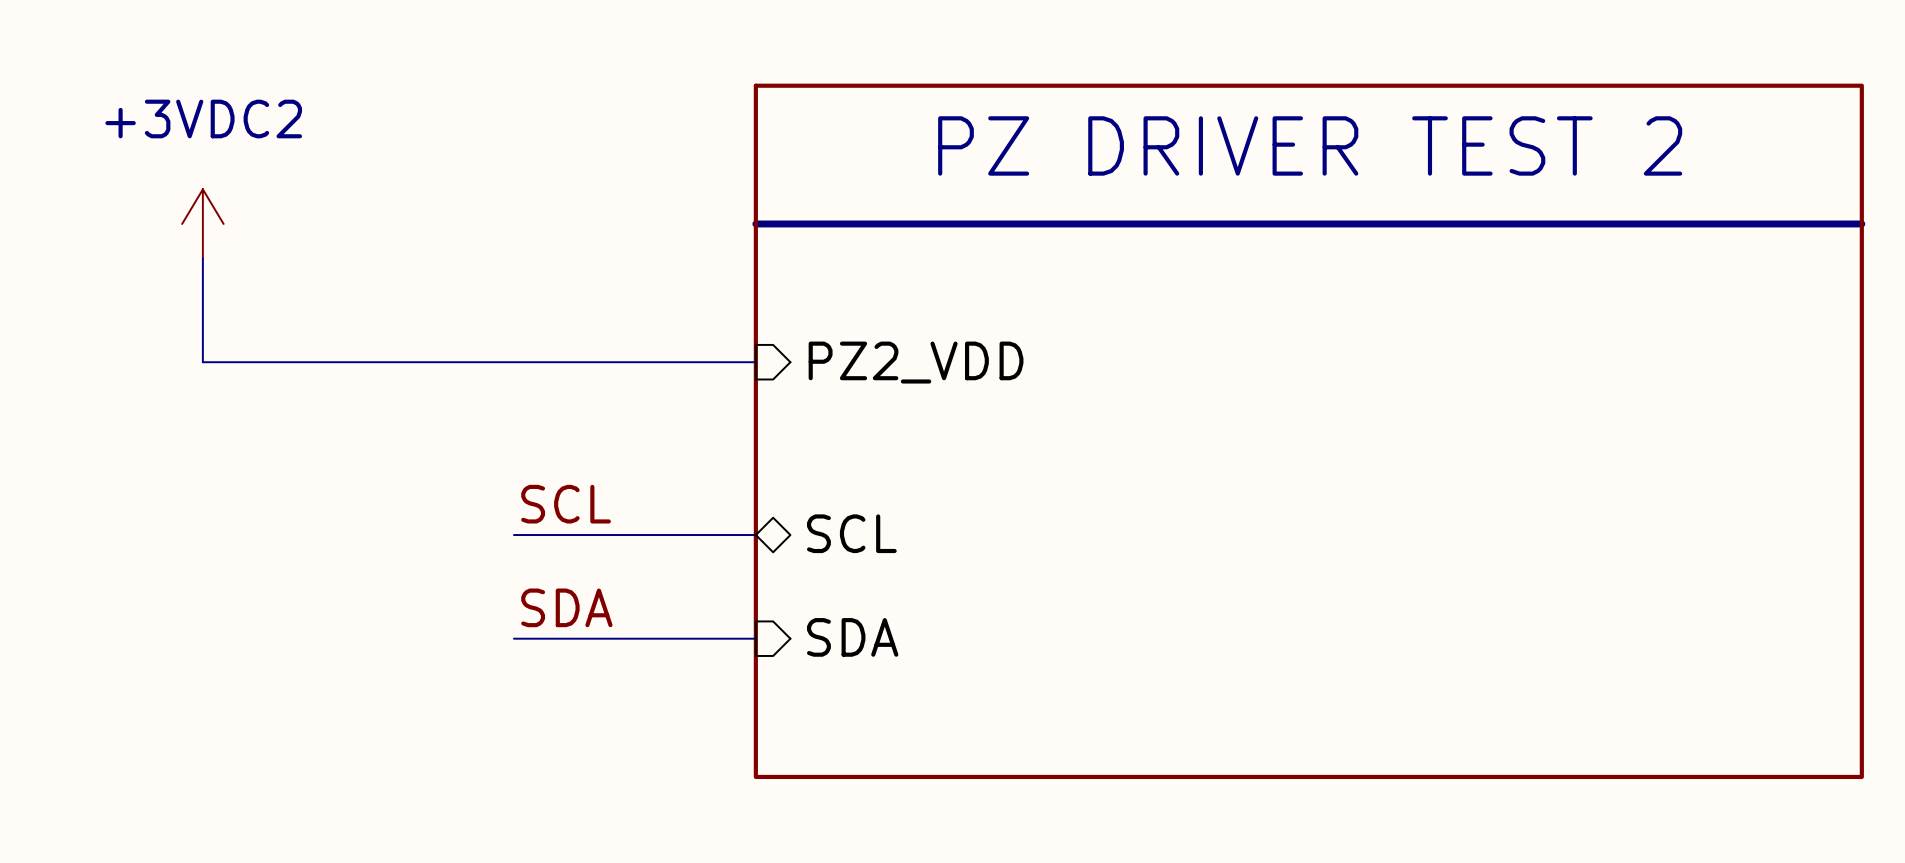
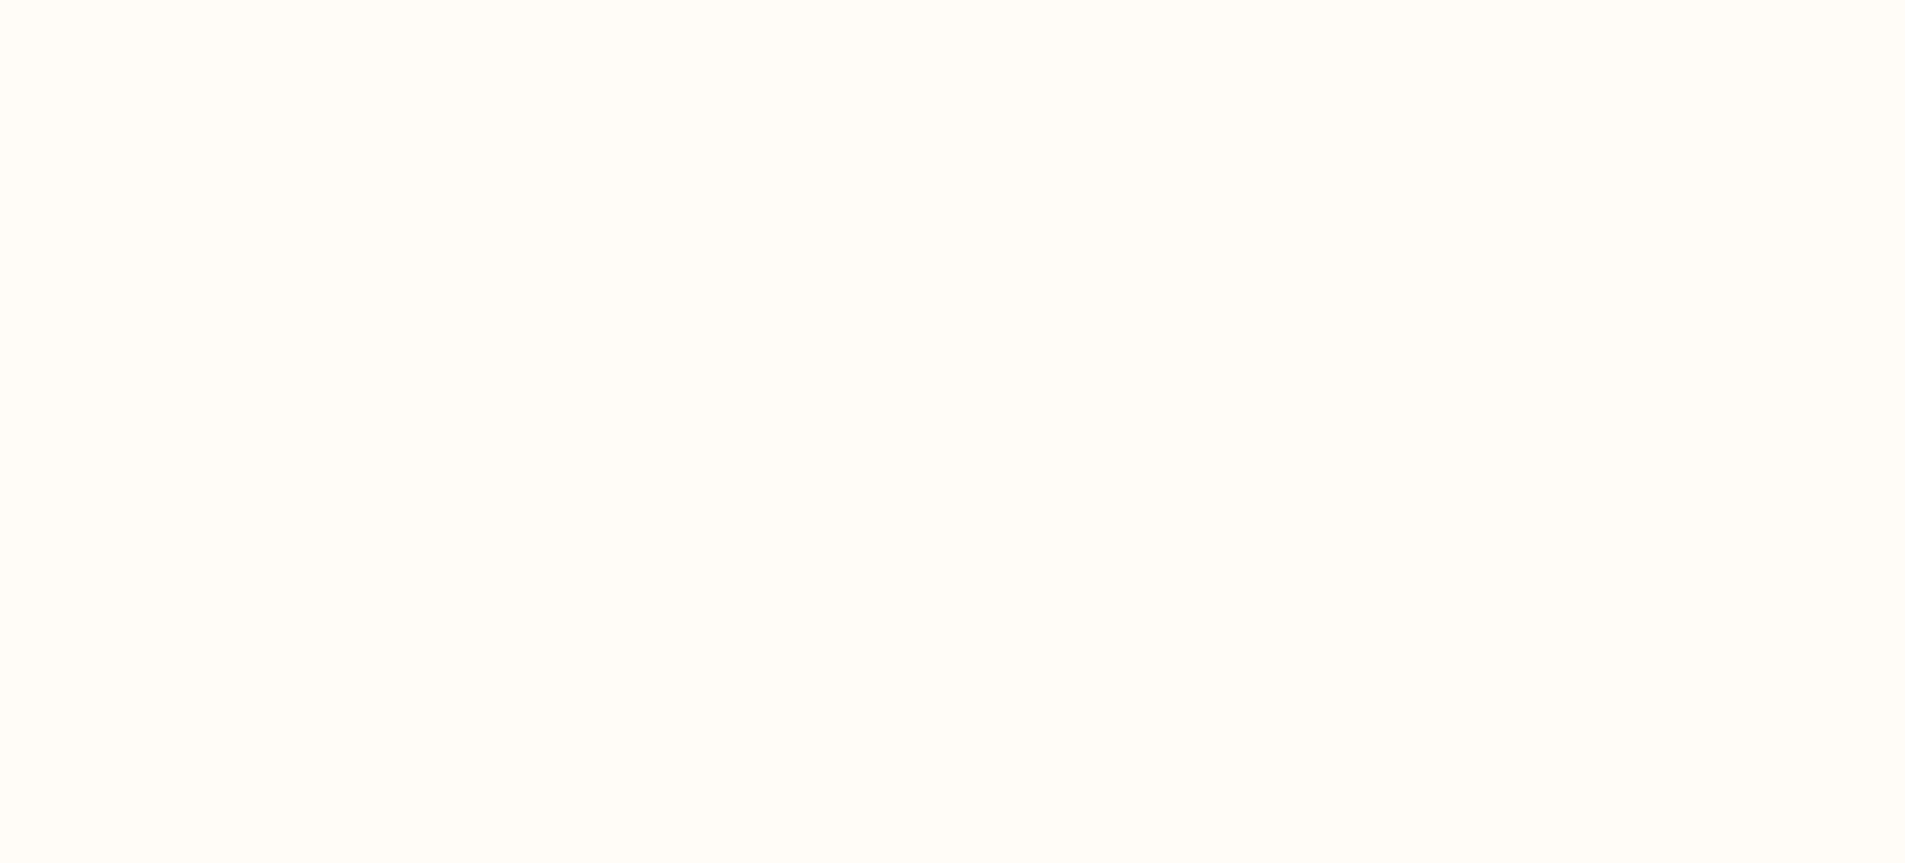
text: PZ DRIVER TEST 2 (1310, 145) -> none
power symbol: +3VDC2 (202, 223) -> none
line: (755, 223) (1861, 223) -> none
wire: (202, 258) (202, 362) (755, 362) -> none
sheet pin: PZ2_VDD (916, 362) -> none
sheet: (1308, 431) -> none
label: SCL (566, 504) -> none
sheet pin: SCL (851, 533) -> none
wire: (513, 535) (755, 535) -> none
label: SDA (566, 607) -> none
sheet pin: SDA (852, 637) -> none
wire: (513, 638) (755, 638) -> none

